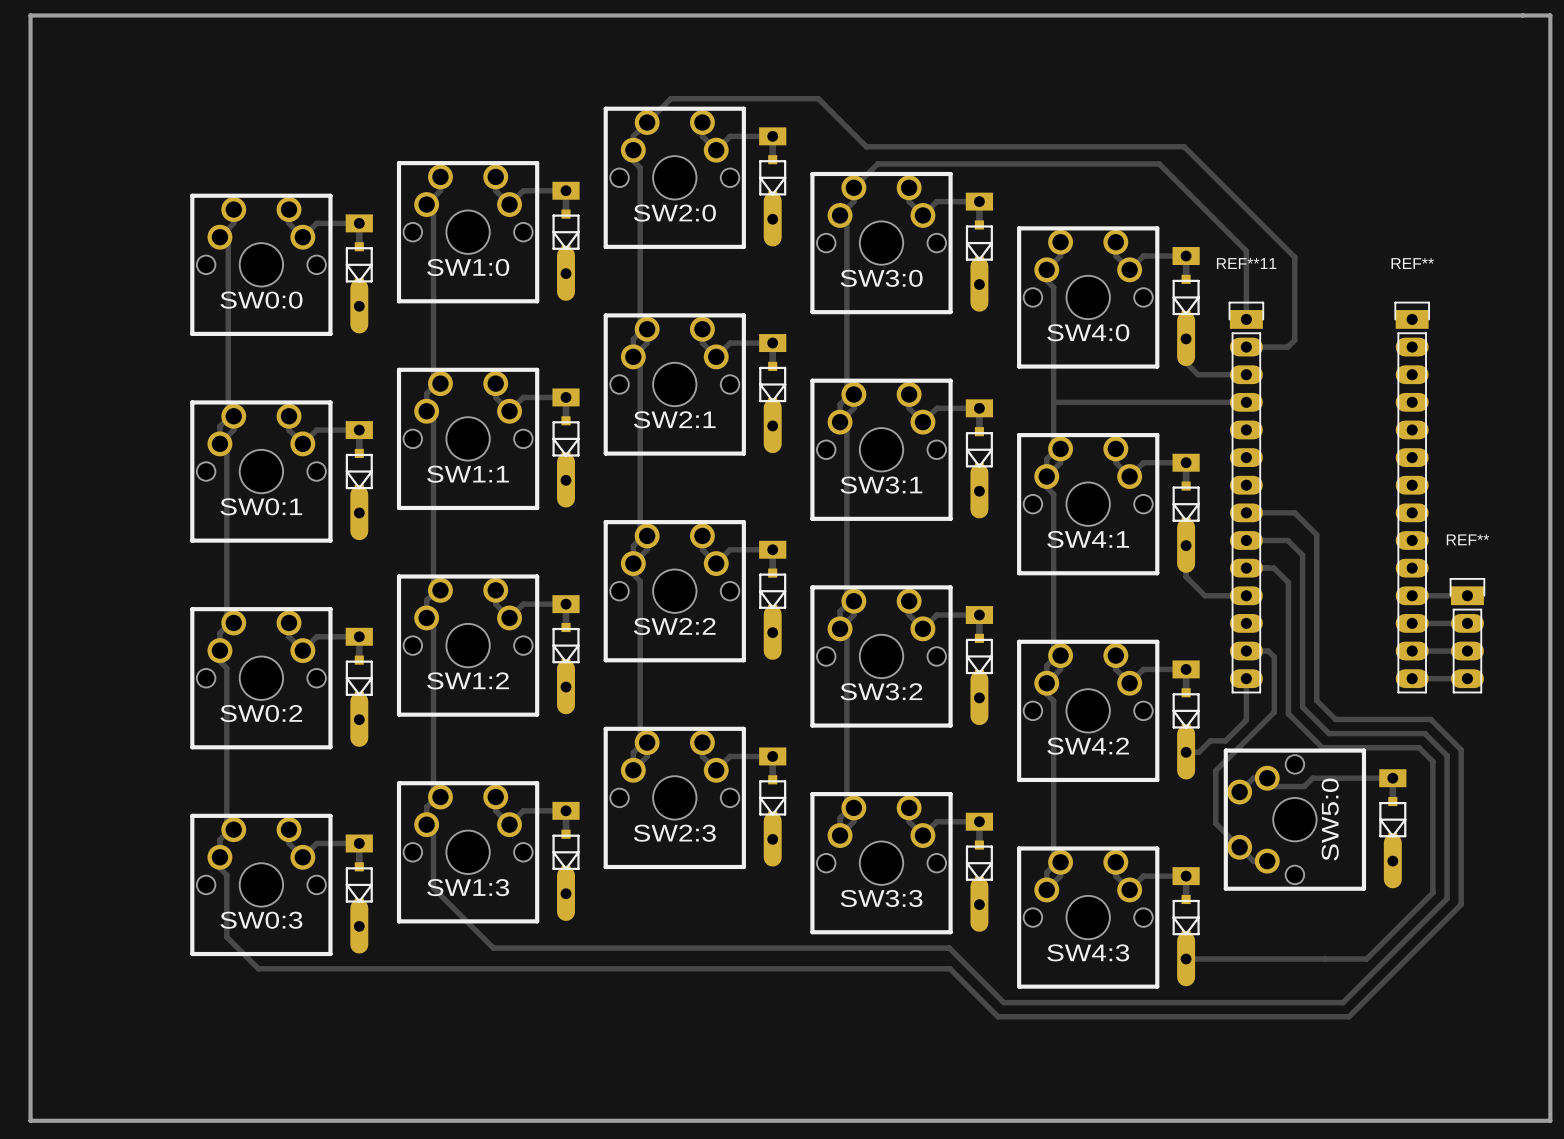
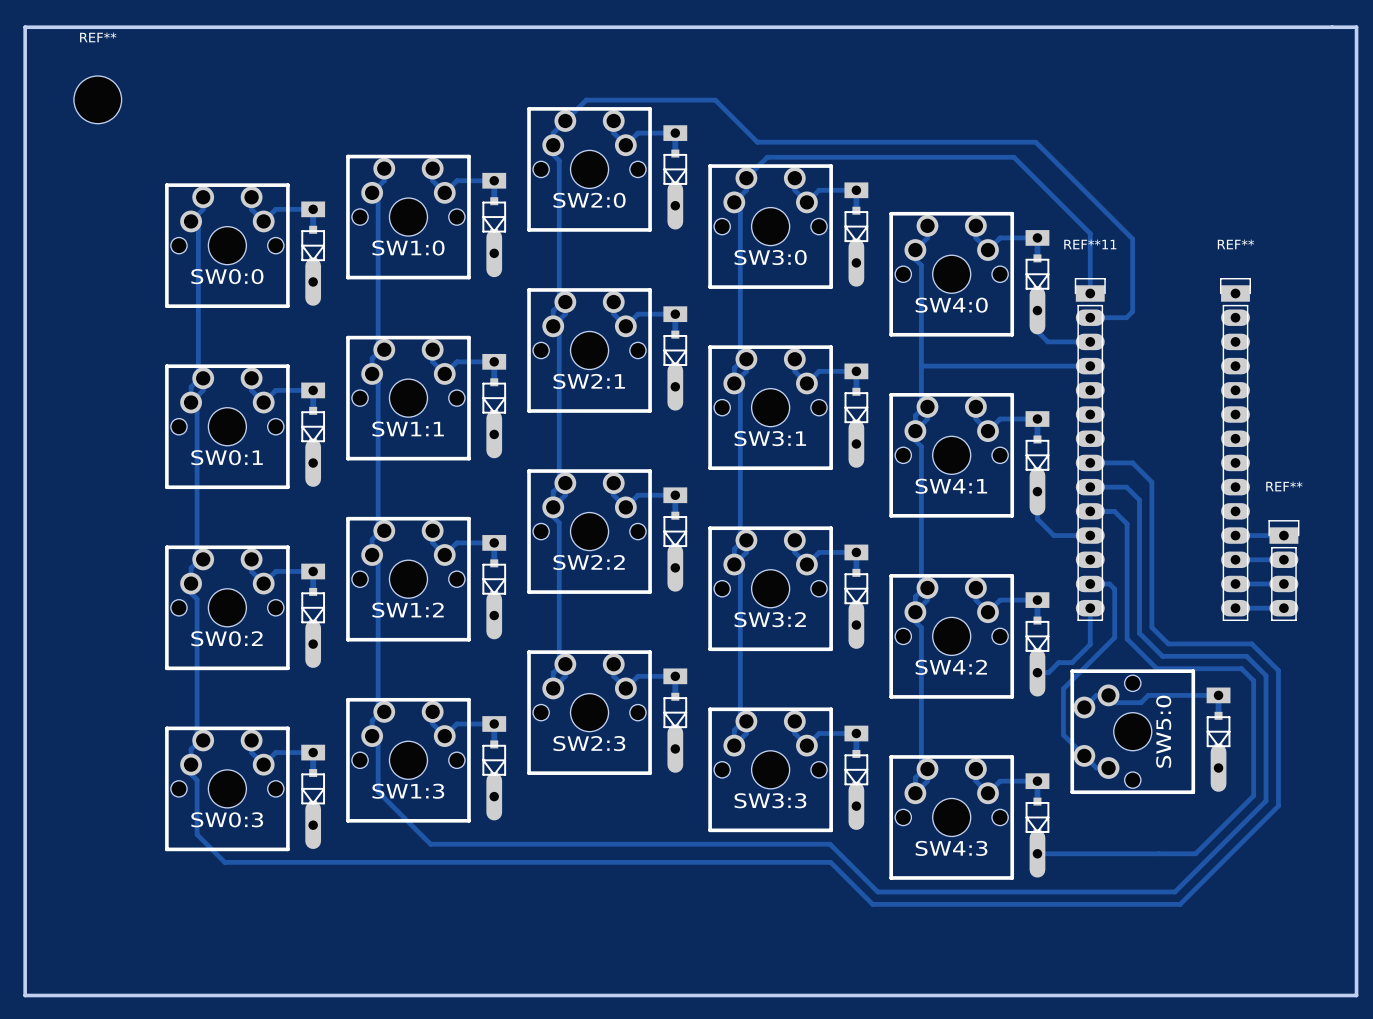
REF**: none -> (97, 99)

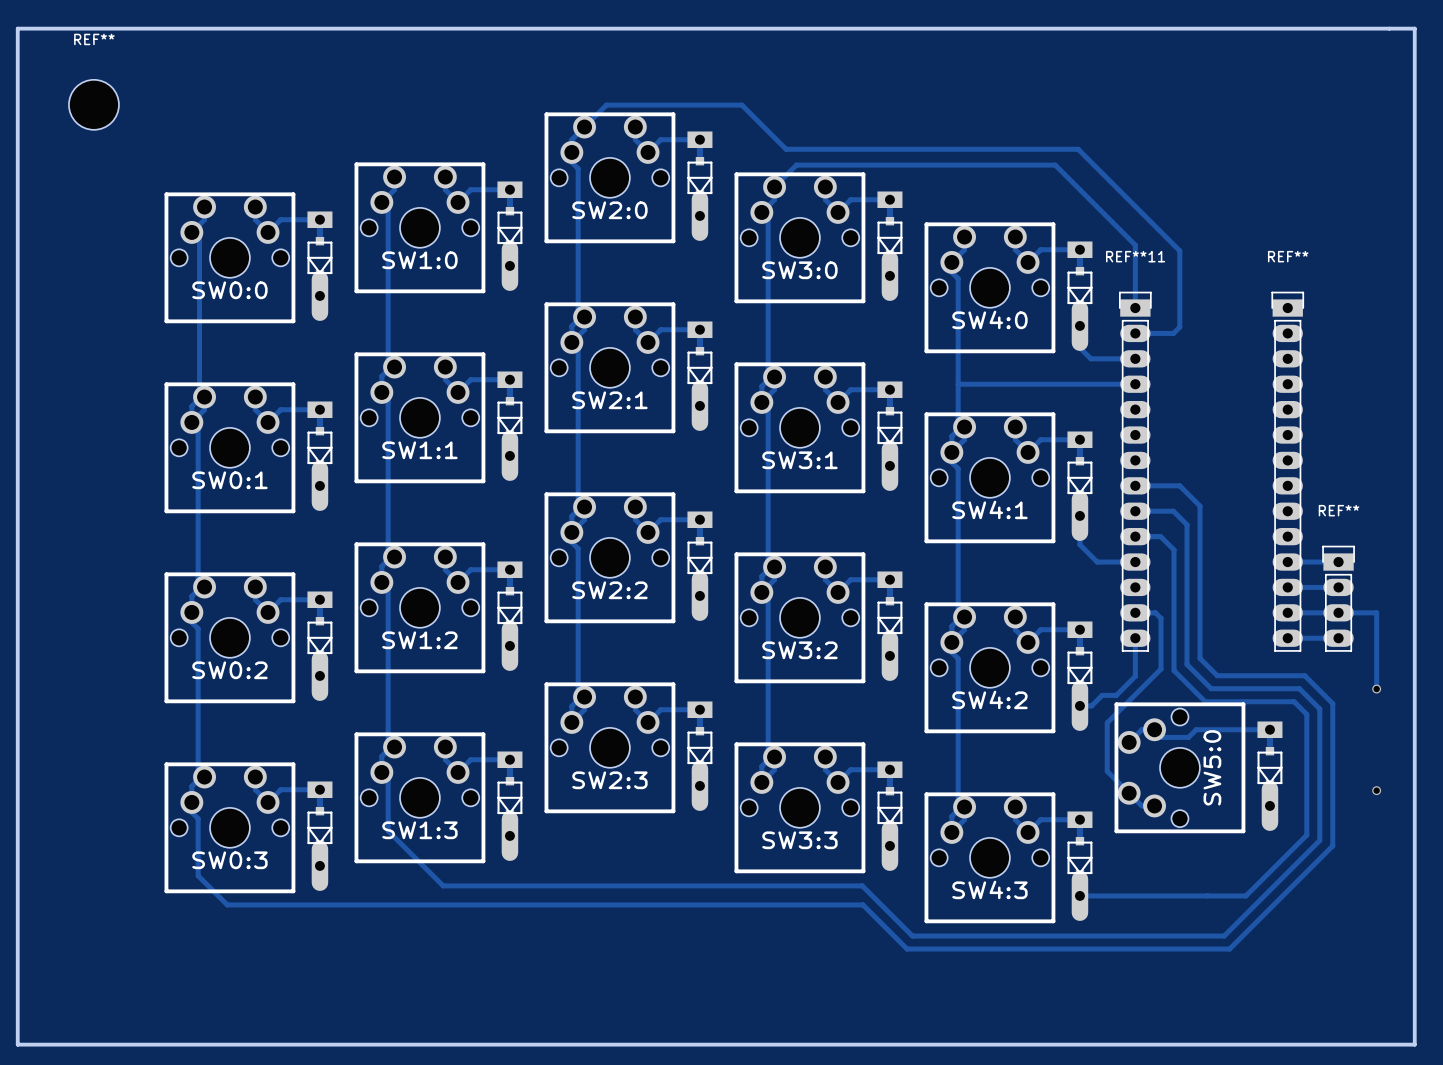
track: none -> (1338, 612) (1376, 612) (1376, 689)
via: none -> (1376, 689)
via: none -> (1376, 790)

